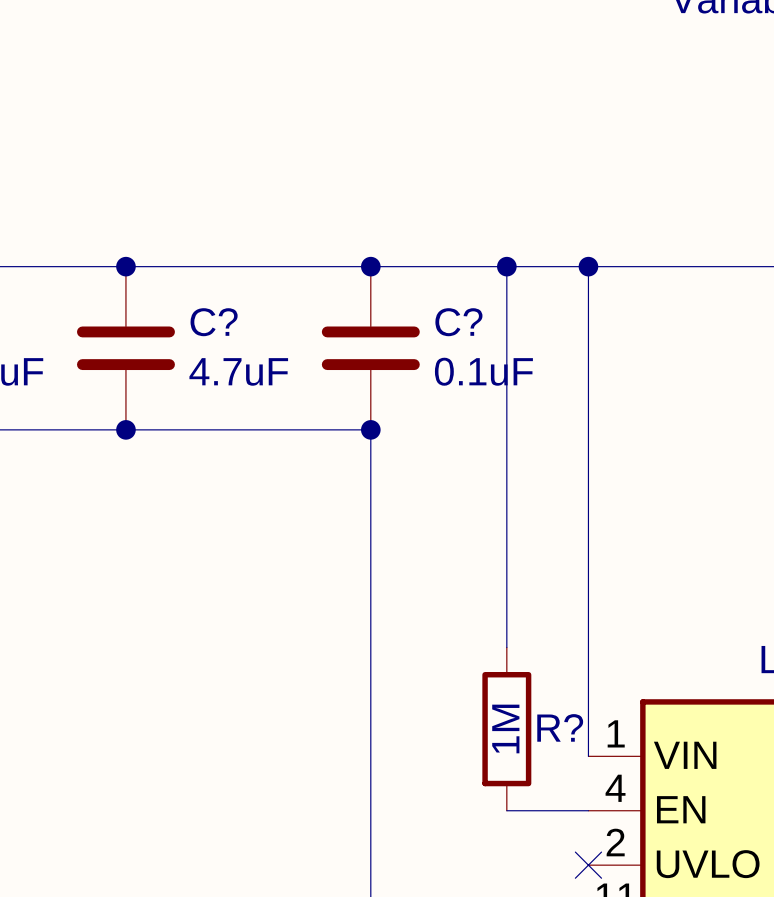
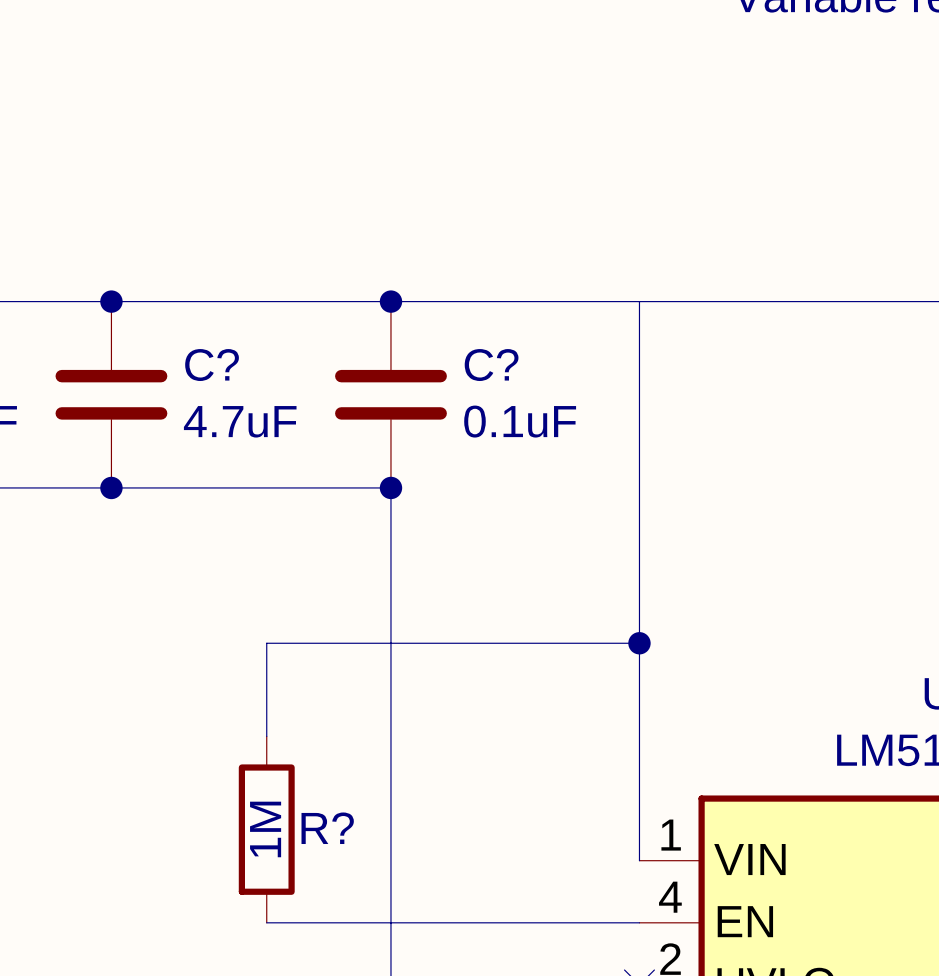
wire: (506, 266) (506, 647) -> none
junction: (506, 266) -> none
junction: (588, 266) -> none
wire: none -> (639, 643) (266, 643) (266, 736)
junction: none -> (639, 643)
R? position: (506, 729) -> (266, 829)
wire: none -> (266, 922) (546, 922)

